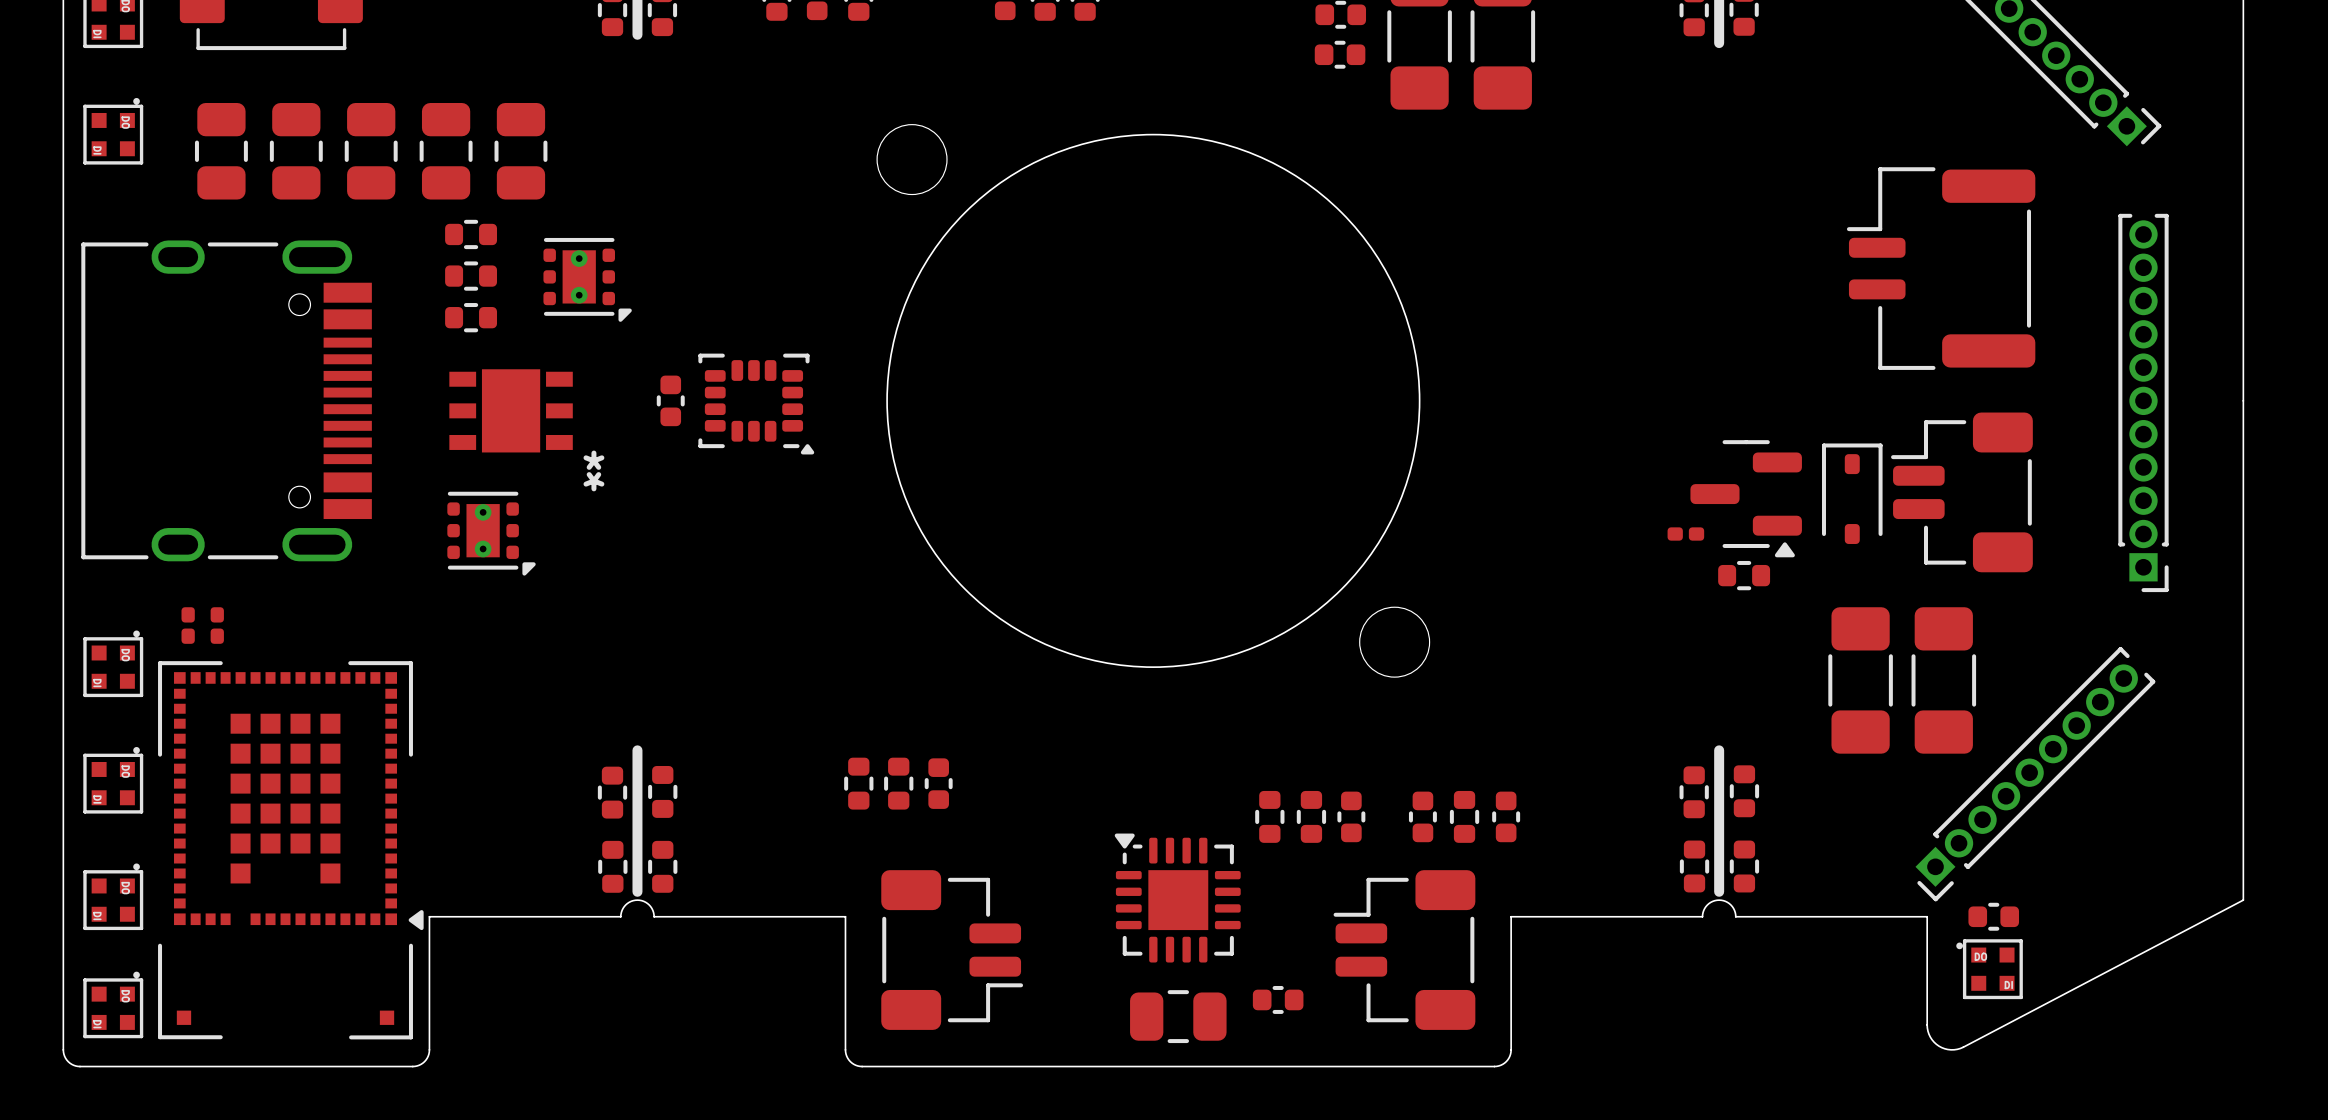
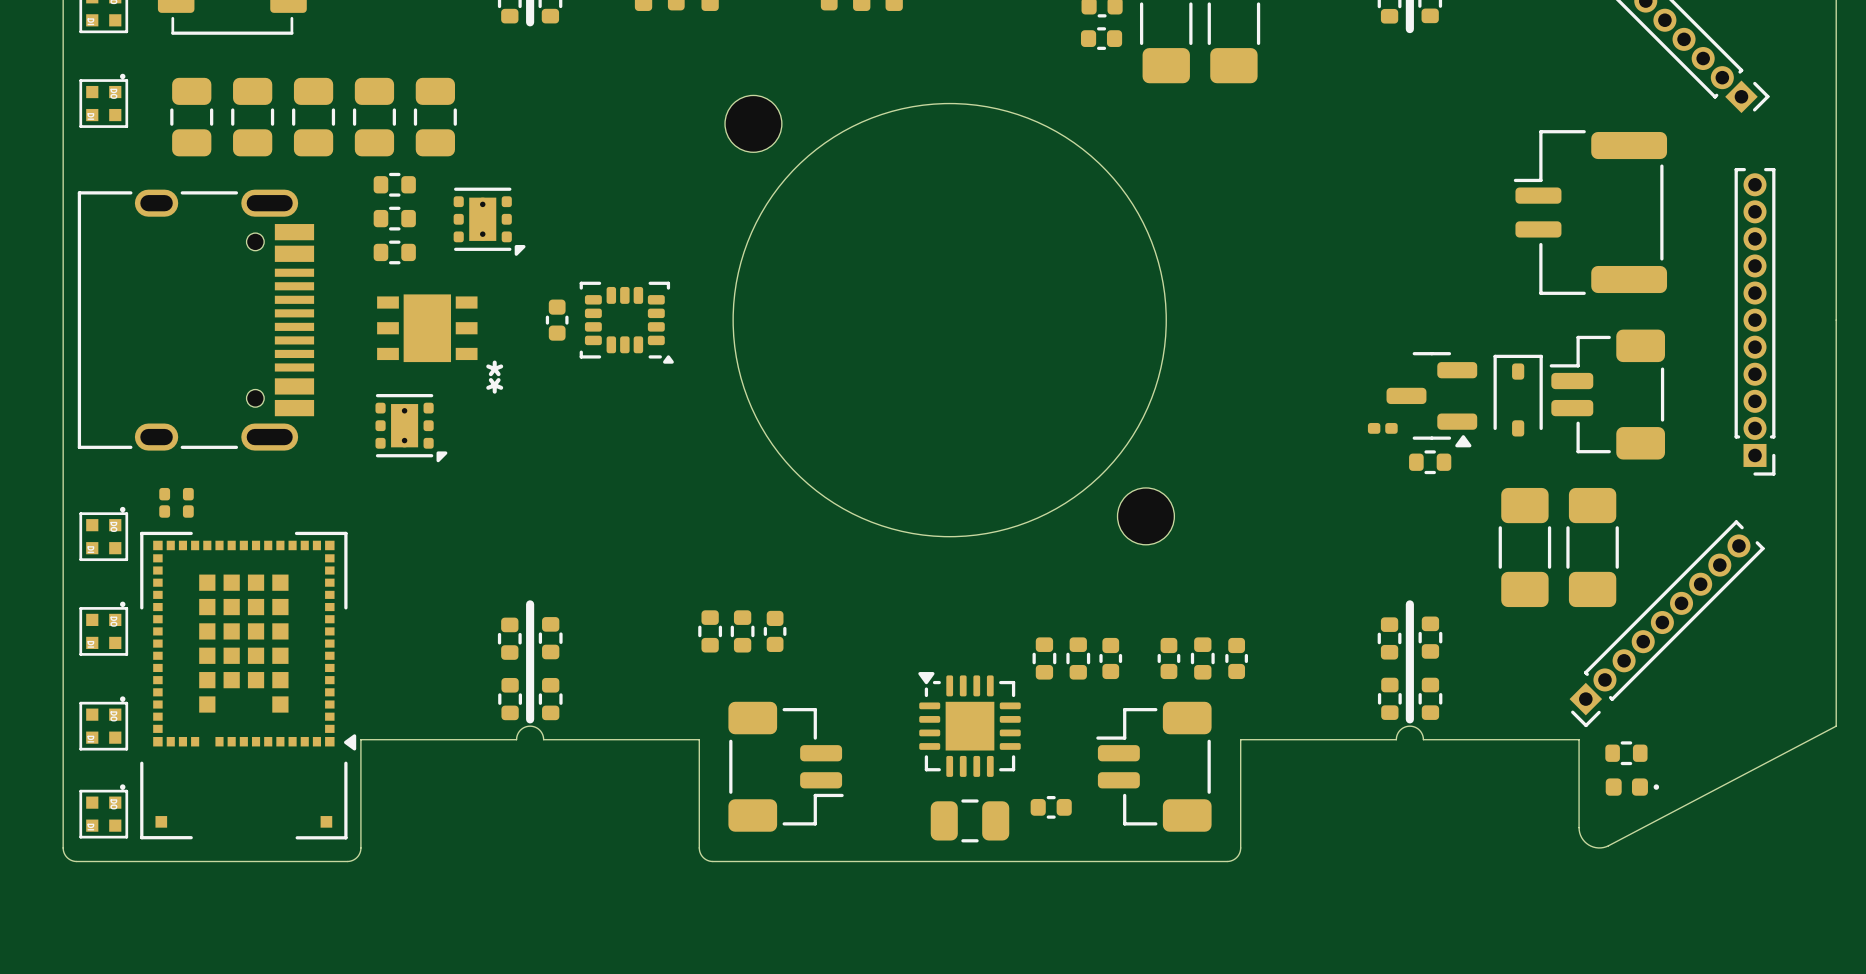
part: (1993, 916) -> none
part: none -> (1626, 753)
part footprint: [1956, 939, 2023, 1000] -> [1605, 778, 1660, 796]

